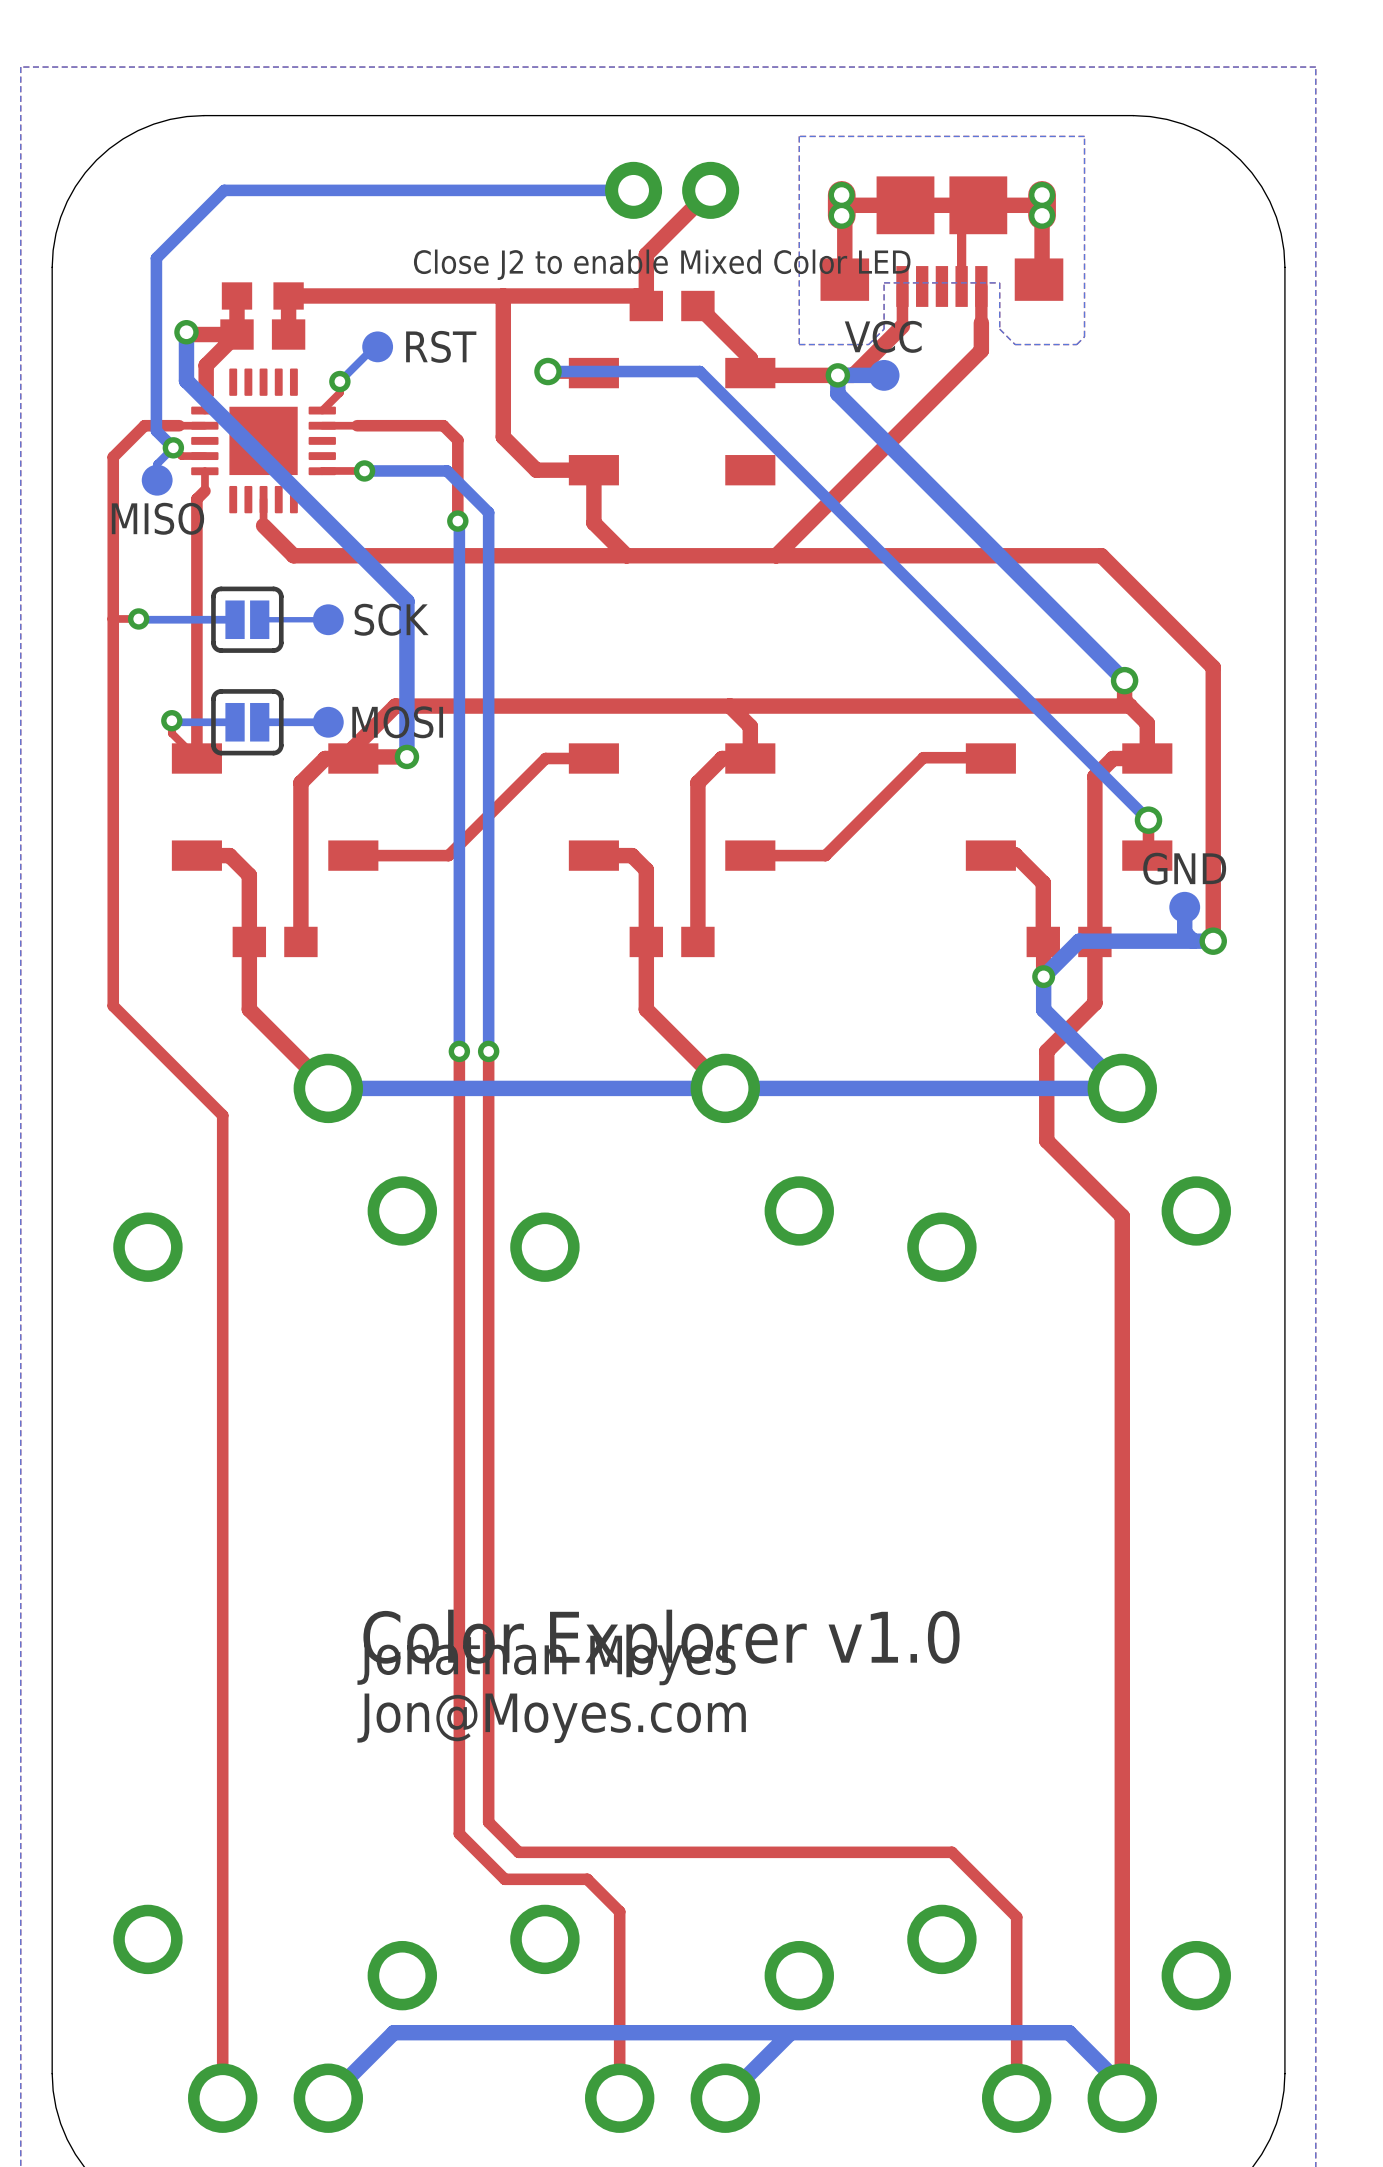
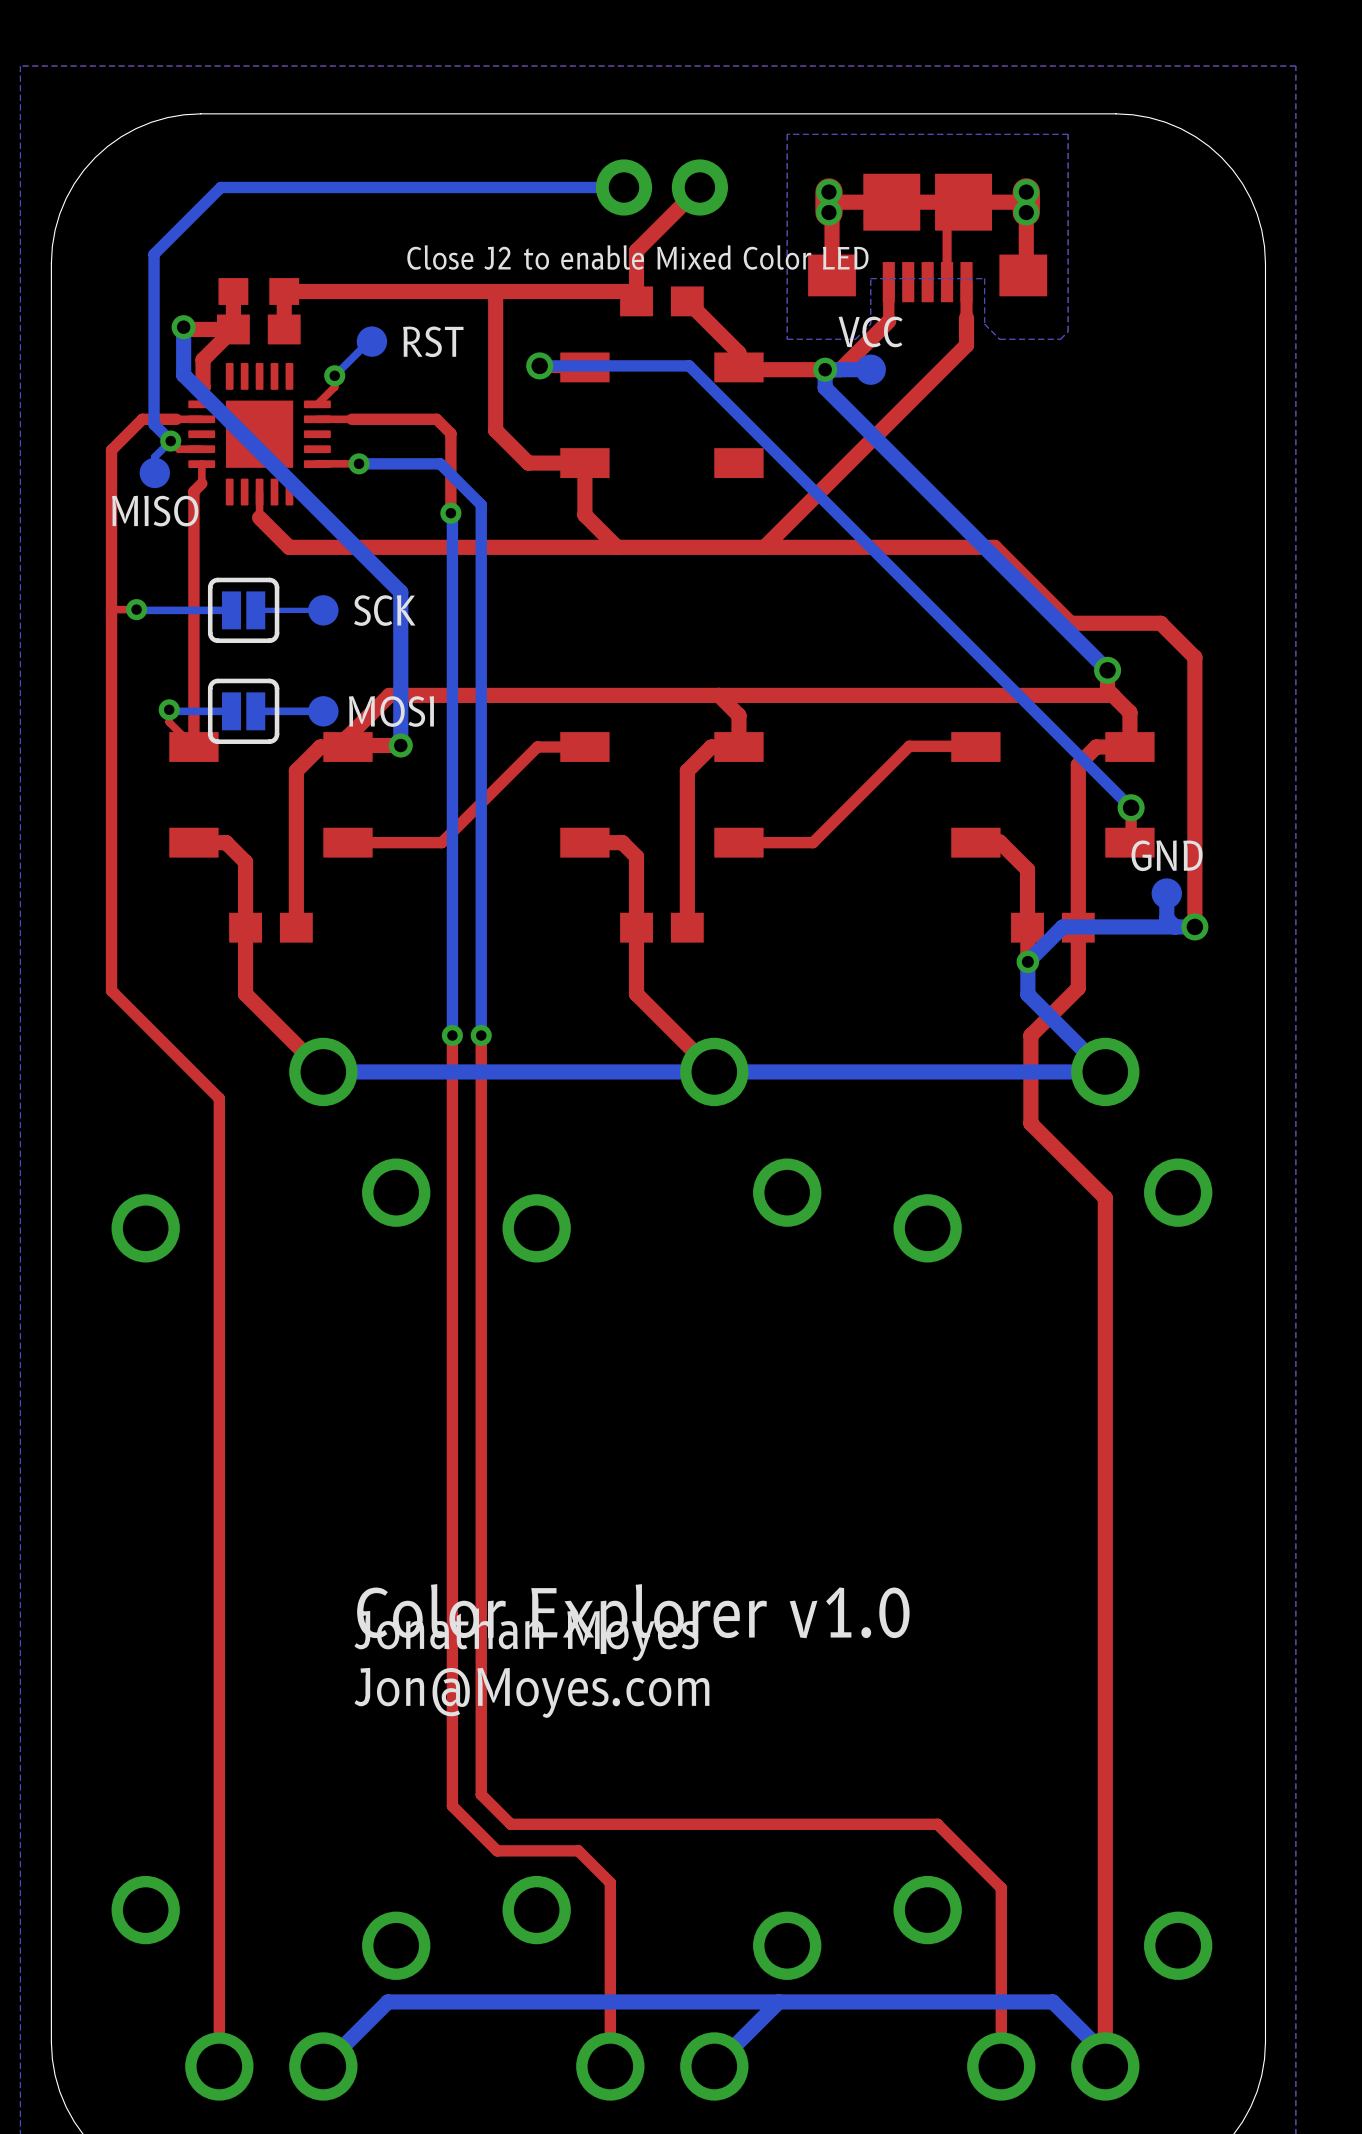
top track: (1009, 555) (1101, 555) (1178, 632) -> (994, 547) (1070, 623) (1160, 623)

